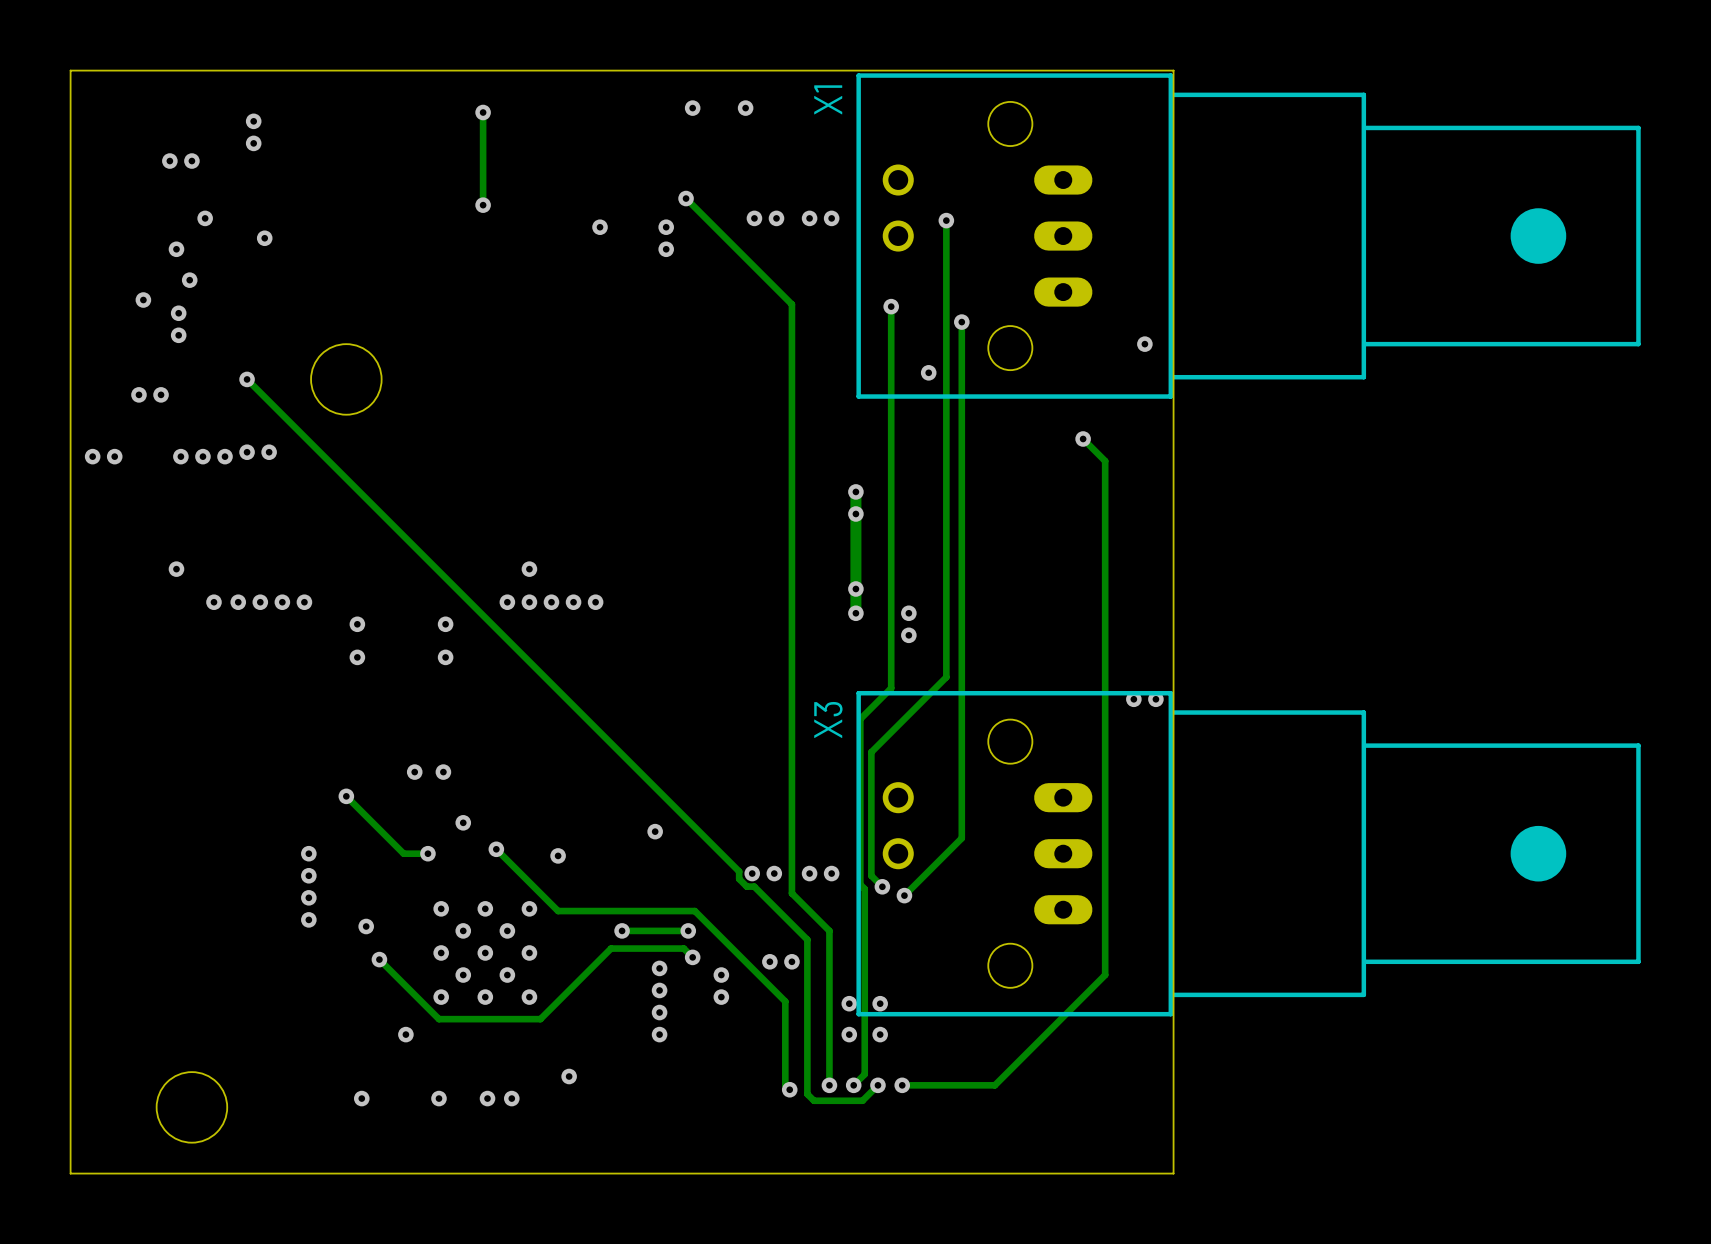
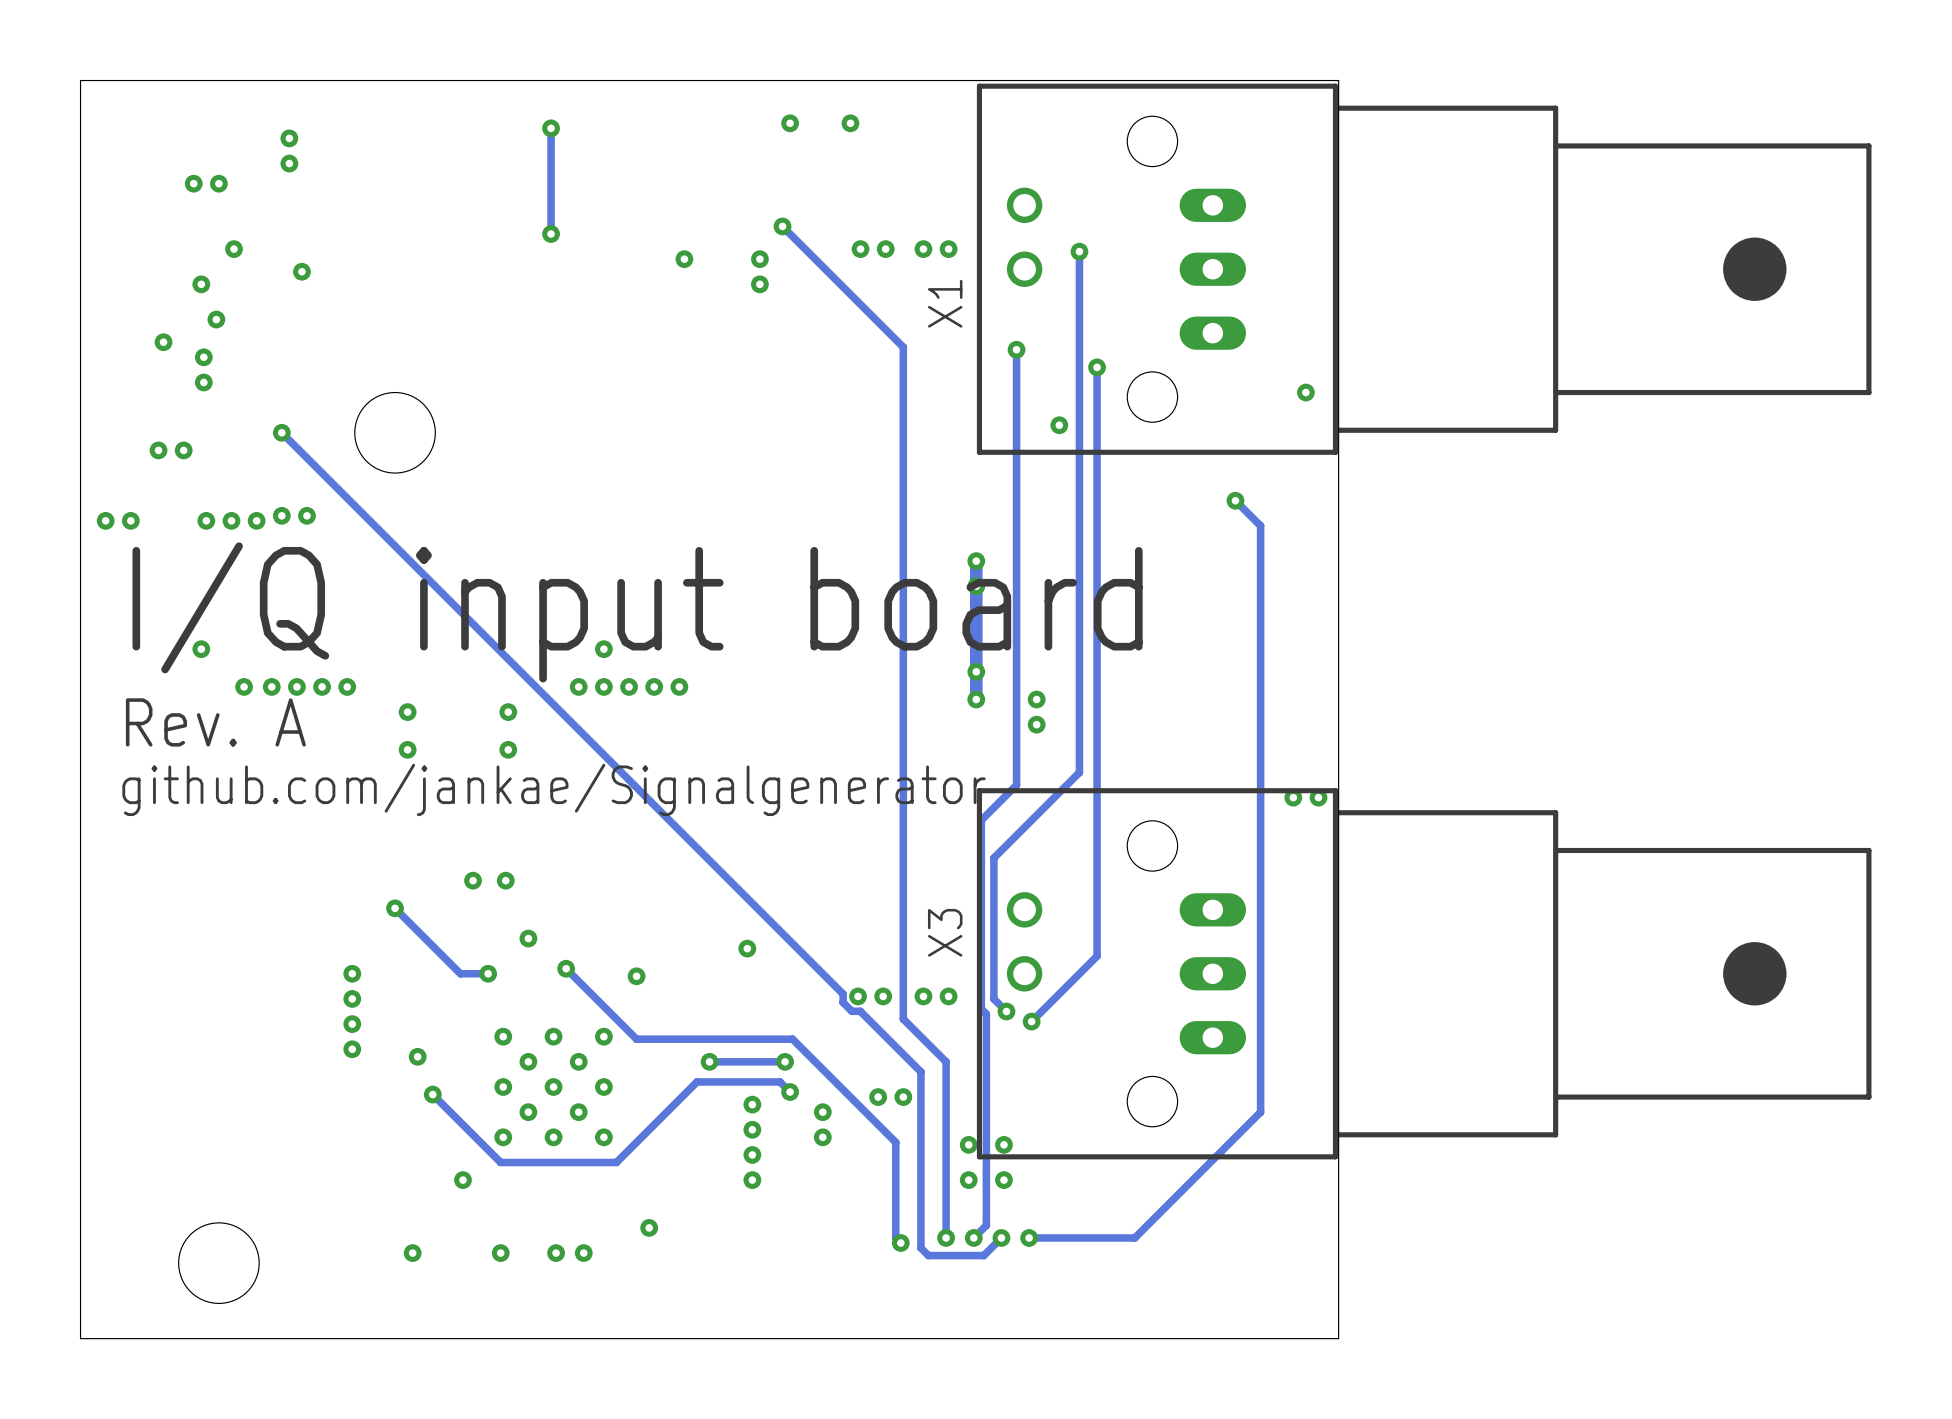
X1 name position: X1 (828, 99) -> X1 (945, 303)
text: none -> I/Q input board (637, 612)
text: none -> Rev. A (215, 722)
text: none -> github.com/jankae/Signalgenerator (554, 789)
X3 name position: X3 (828, 720) -> X3 (945, 932)

